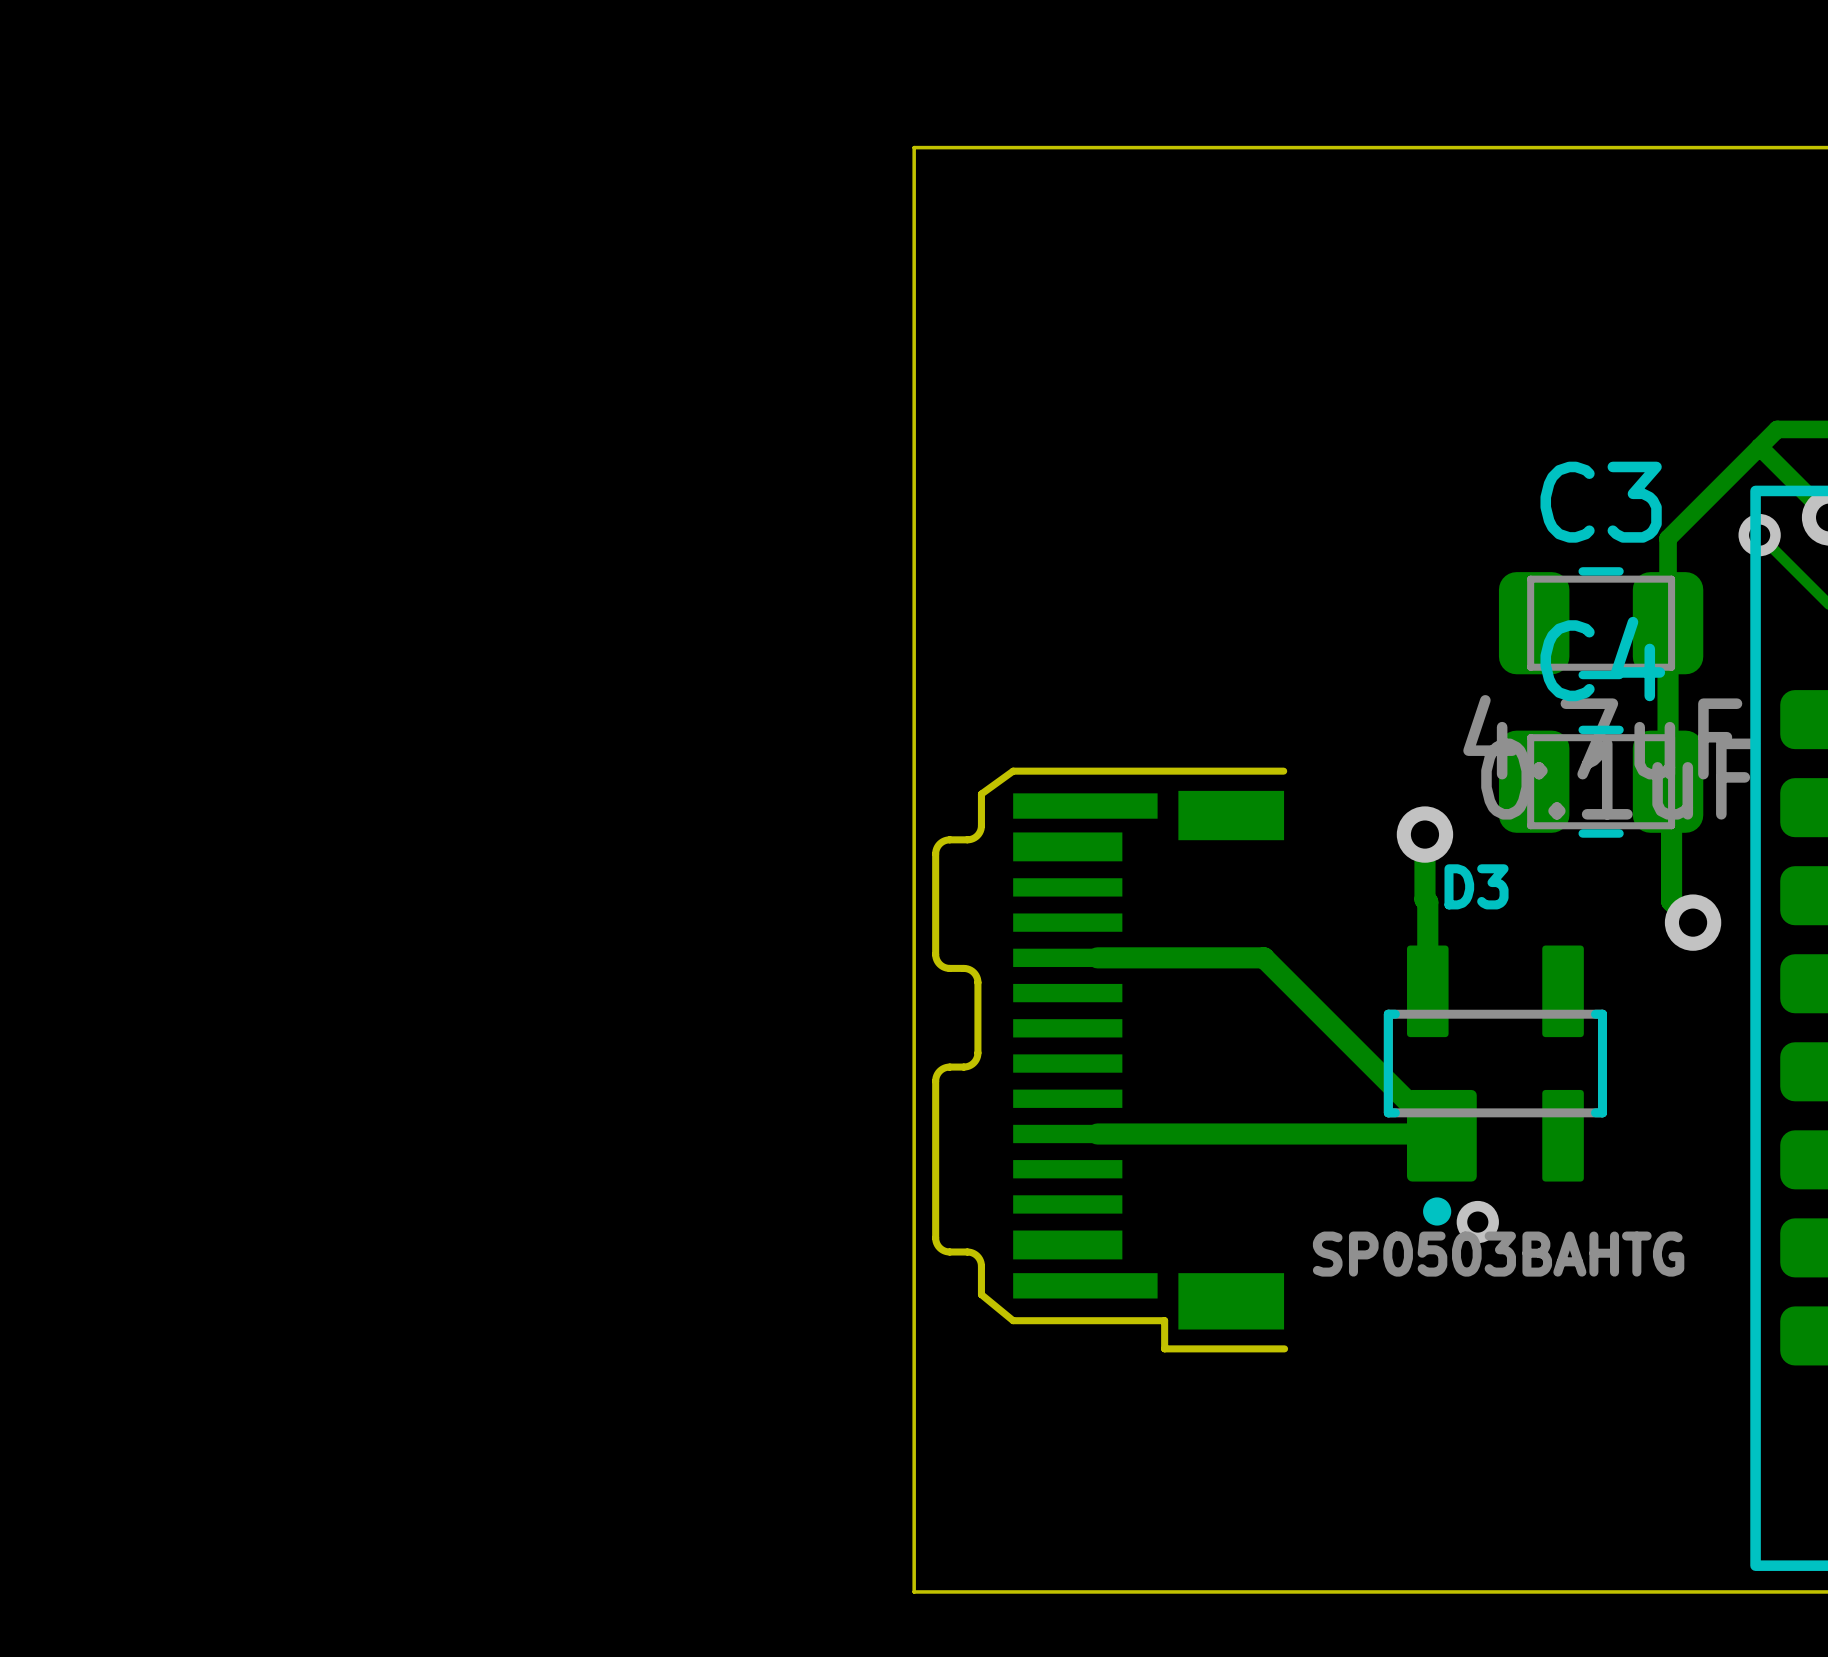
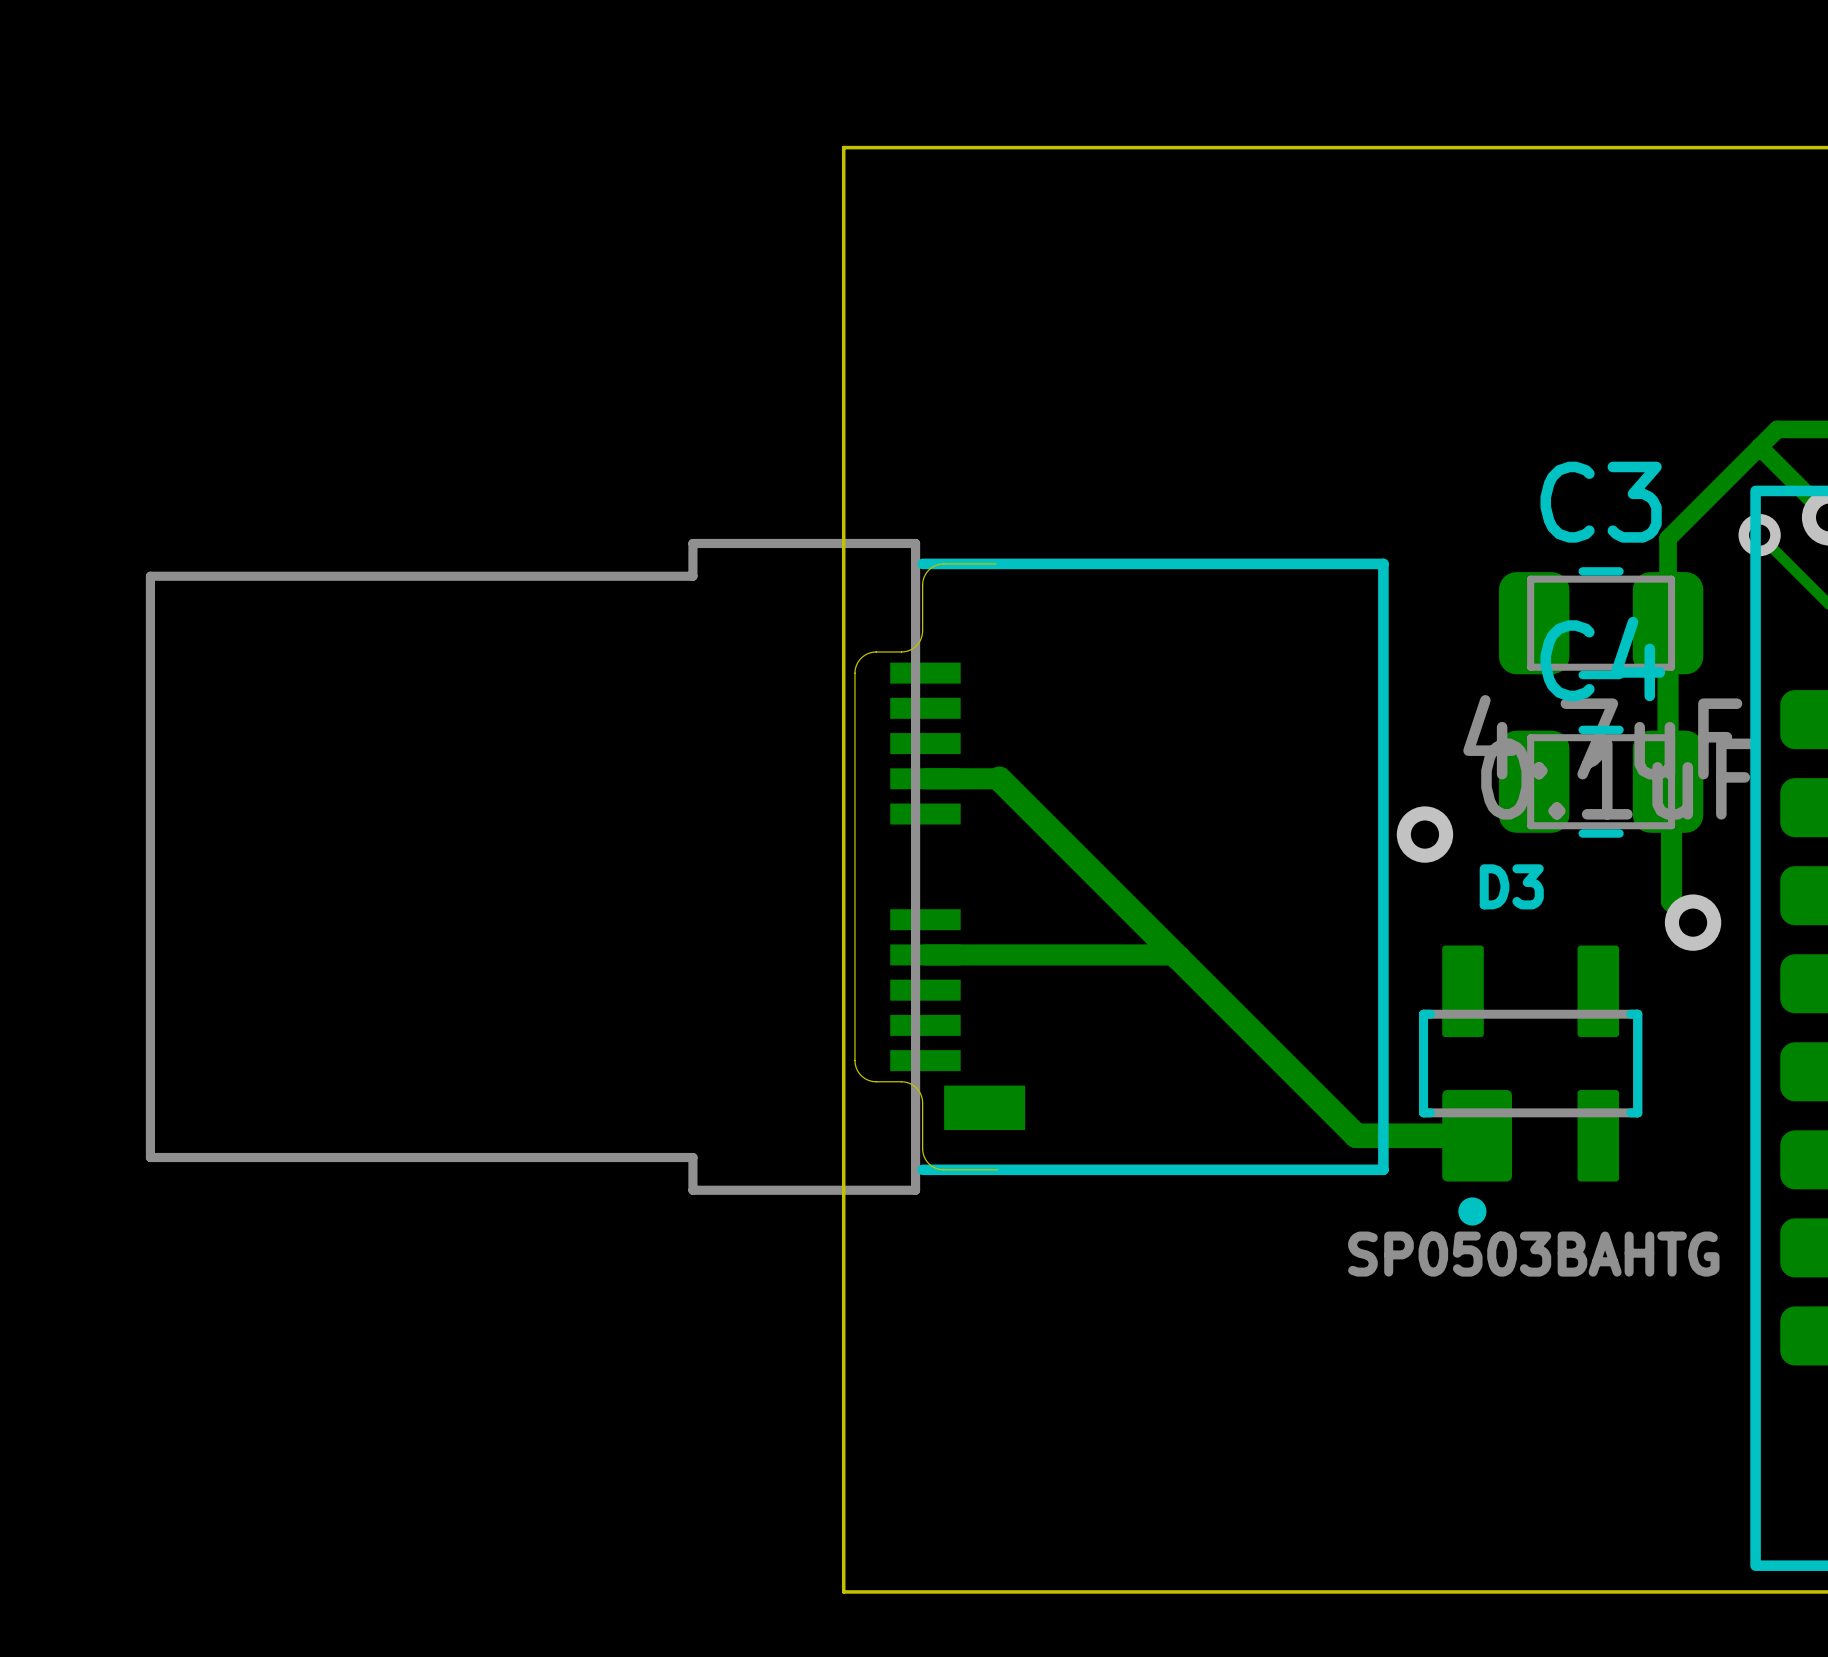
board edge: (914, 147) (914, 1591) -> (914, 147) (843, 147) (843, 1591) (914, 1591)
track: none -> (925, 778) (999, 778) (1356, 1135) (1477, 1135)
track: (1424, 834) (1424, 899) (1427, 902) (1427, 991) -> none
part: none -> (767, 866)
track: none -> (925, 954) (1175, 954) (1178, 957)
track: (1097, 957) (1263, 957) (1441, 1135) -> none
part: (1110, 1060) -> none
D3 position: (1495, 1085) -> (1530, 1085)
track: (1440, 1133) (1097, 1133) -> none
via: (1477, 1222) -> none

